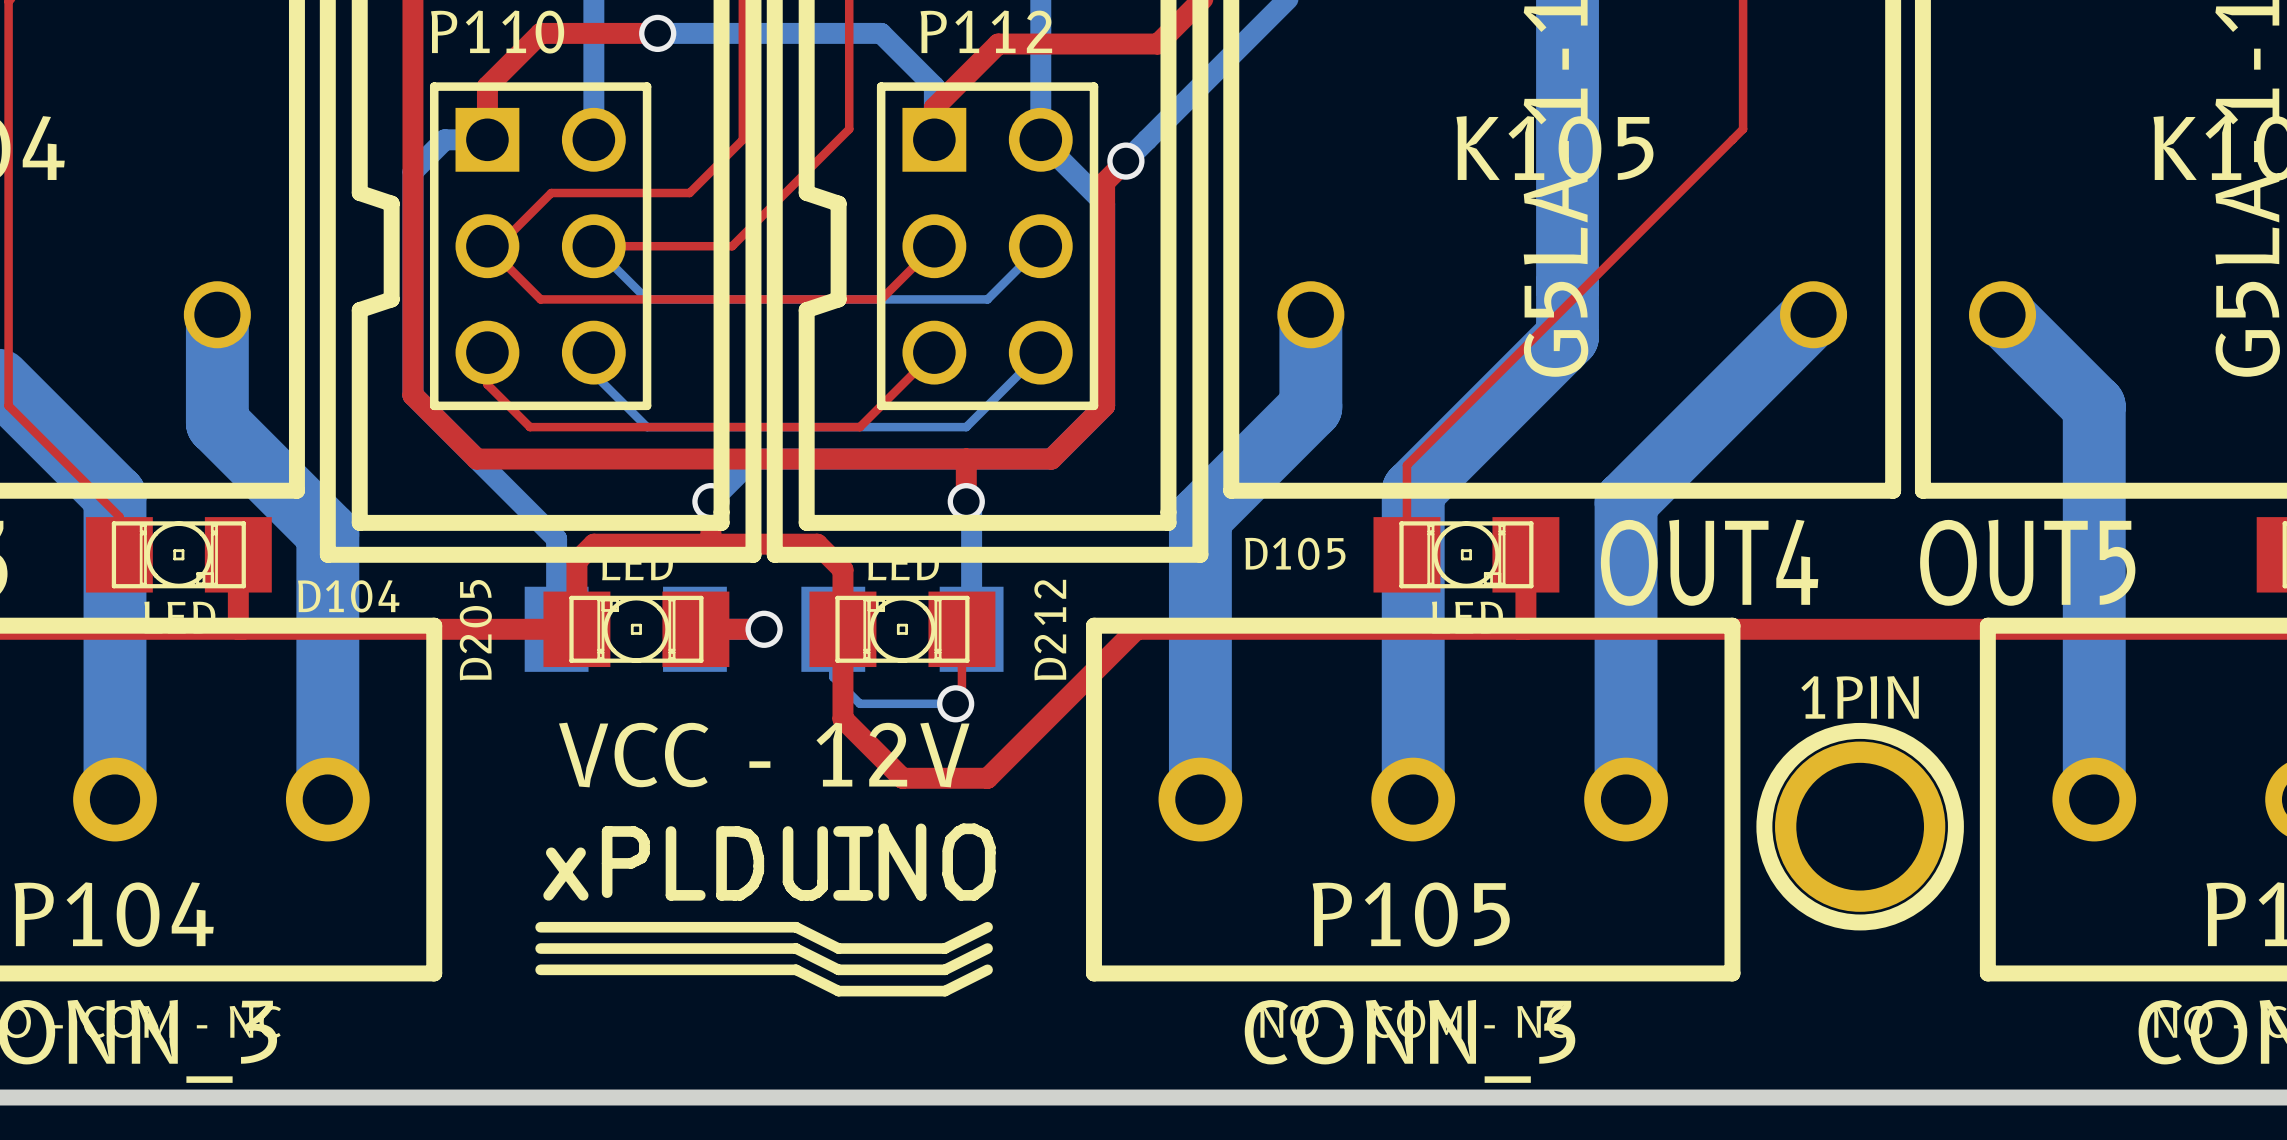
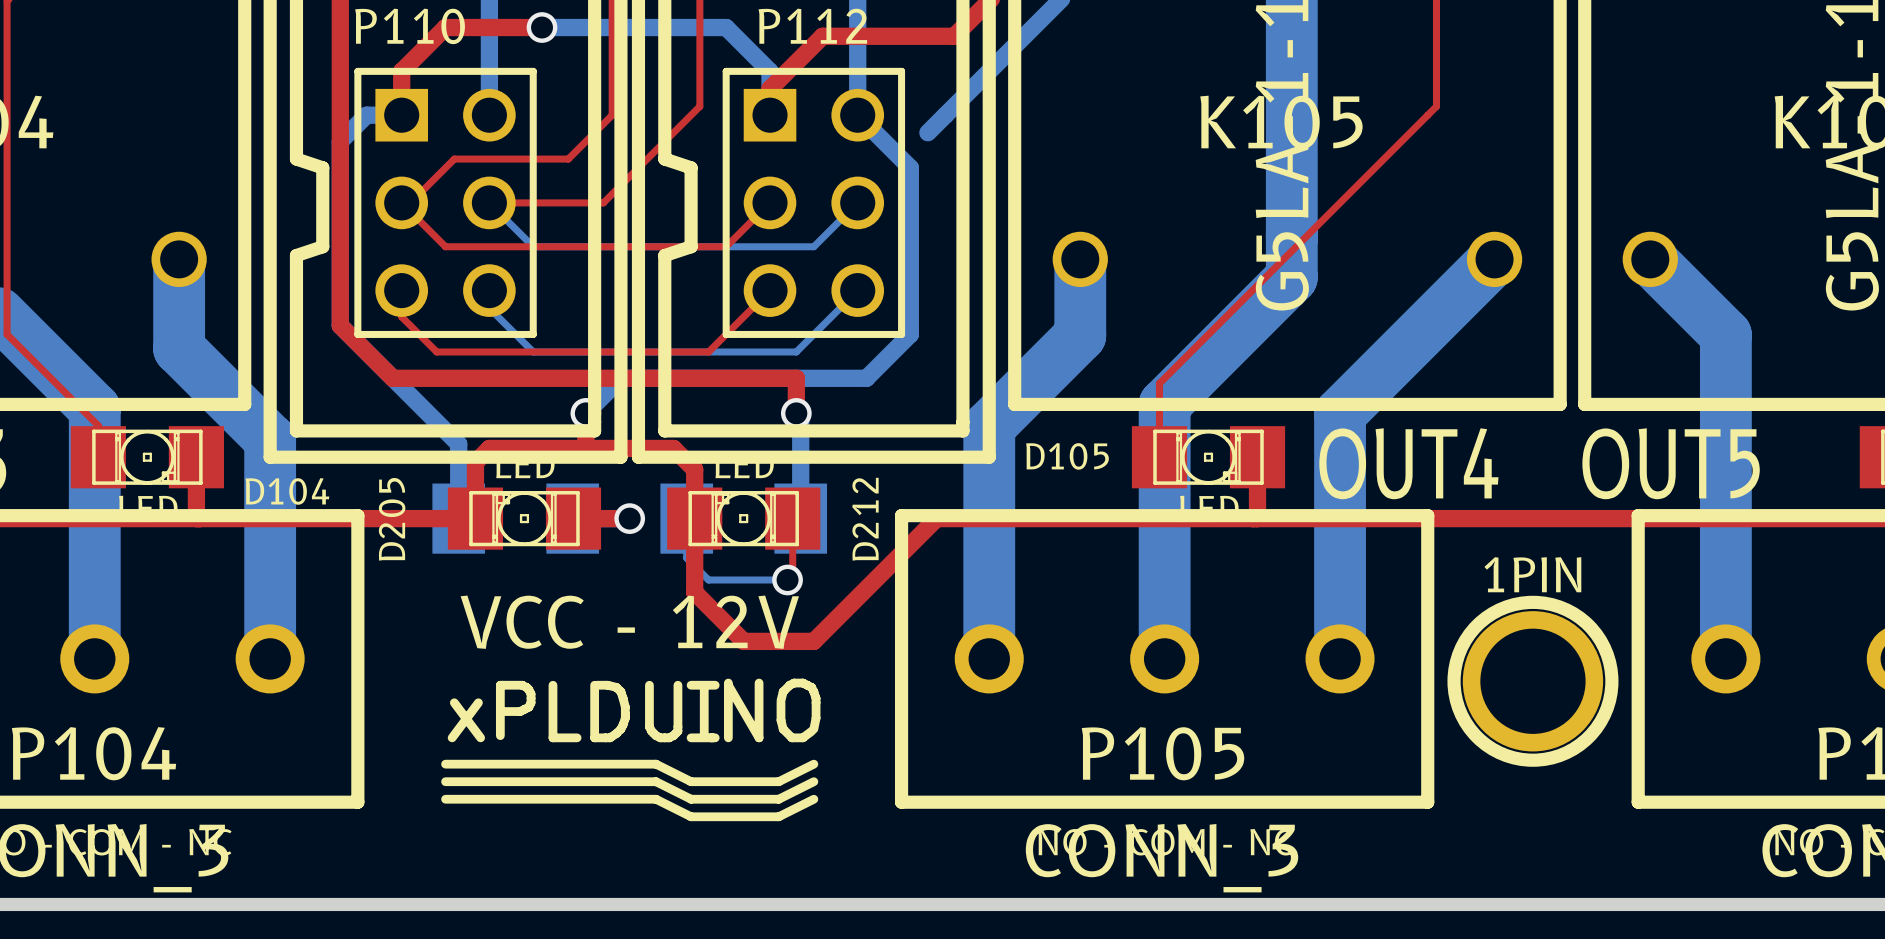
top track: (1125, 161) (1104, 182) (1104, 405) (1051, 459) (966, 459) -> none
via: (1125, 161) -> none

